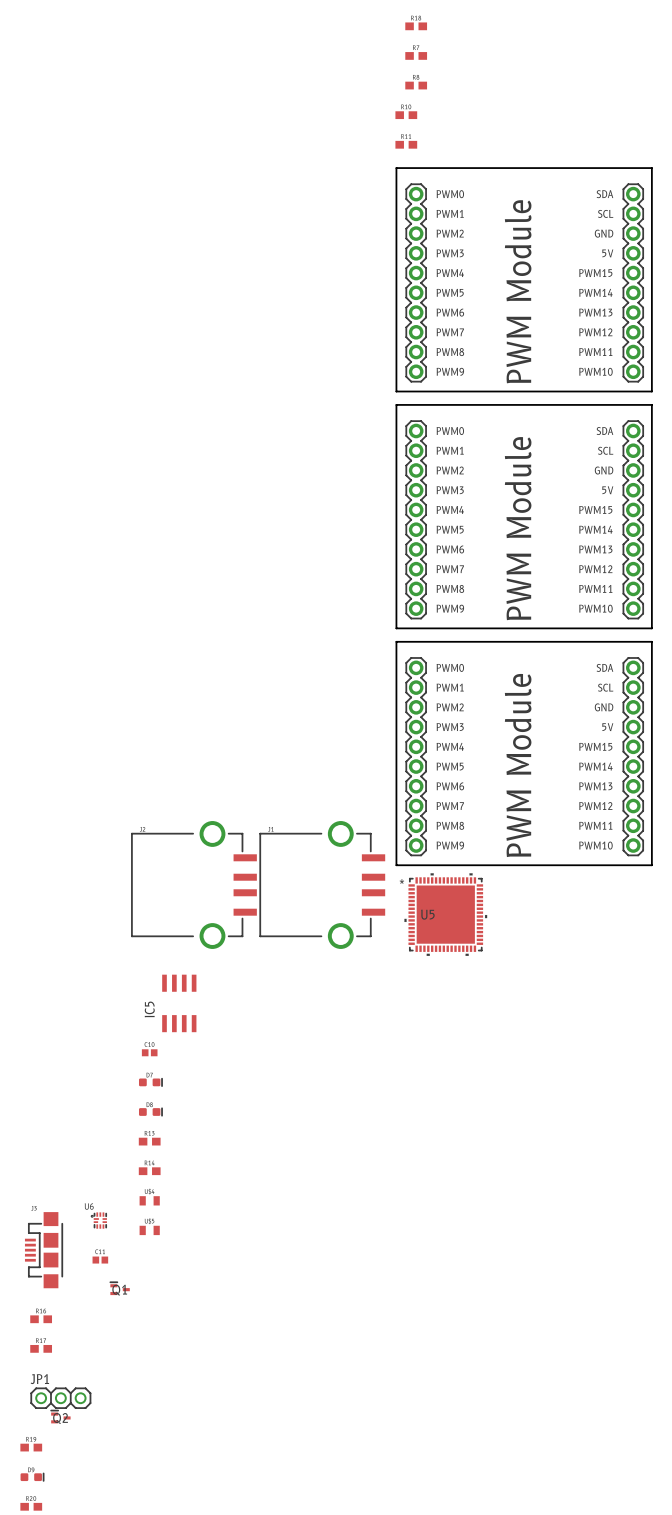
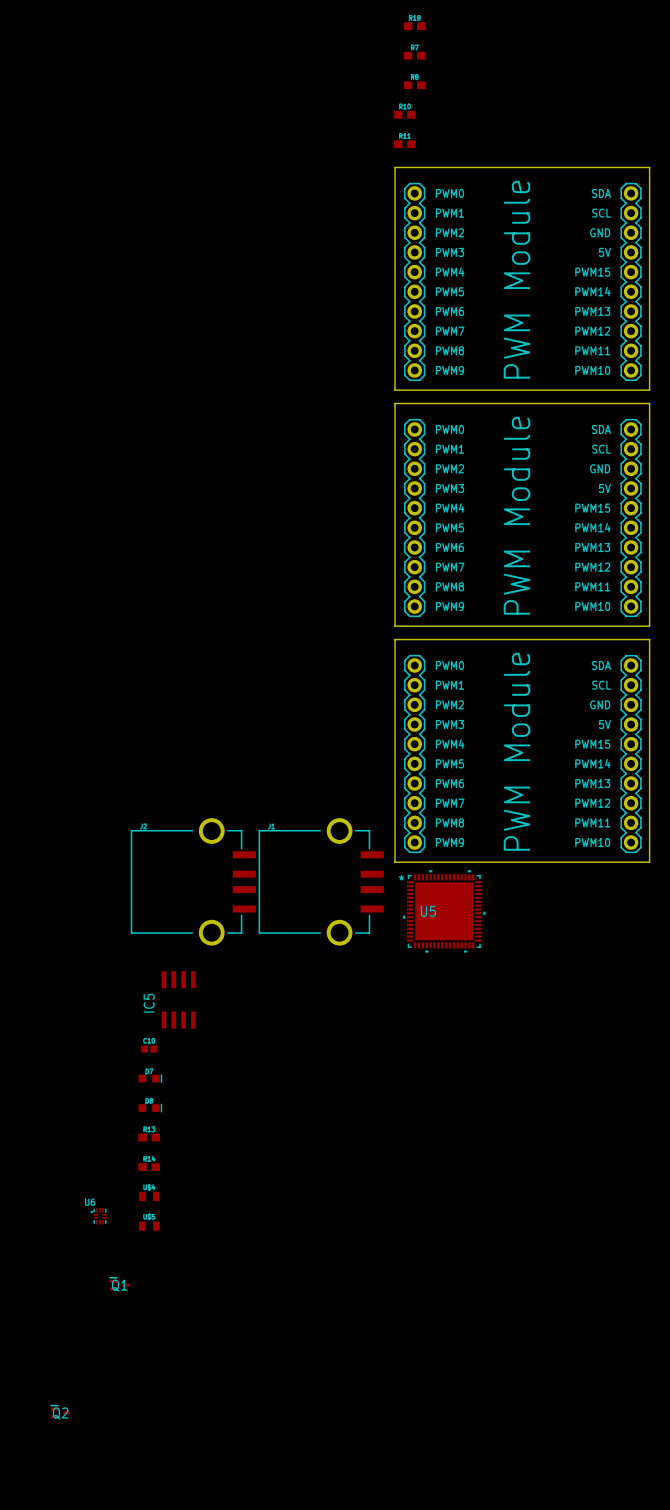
part: (44, 1250) -> none
part: (100, 1260) -> none
part: (41, 1319) -> none
part: (41, 1348) -> none
JP1: (60, 1398) -> none
part: (31, 1447) -> none
part: (32, 1477) -> none
part: (31, 1506) -> none

